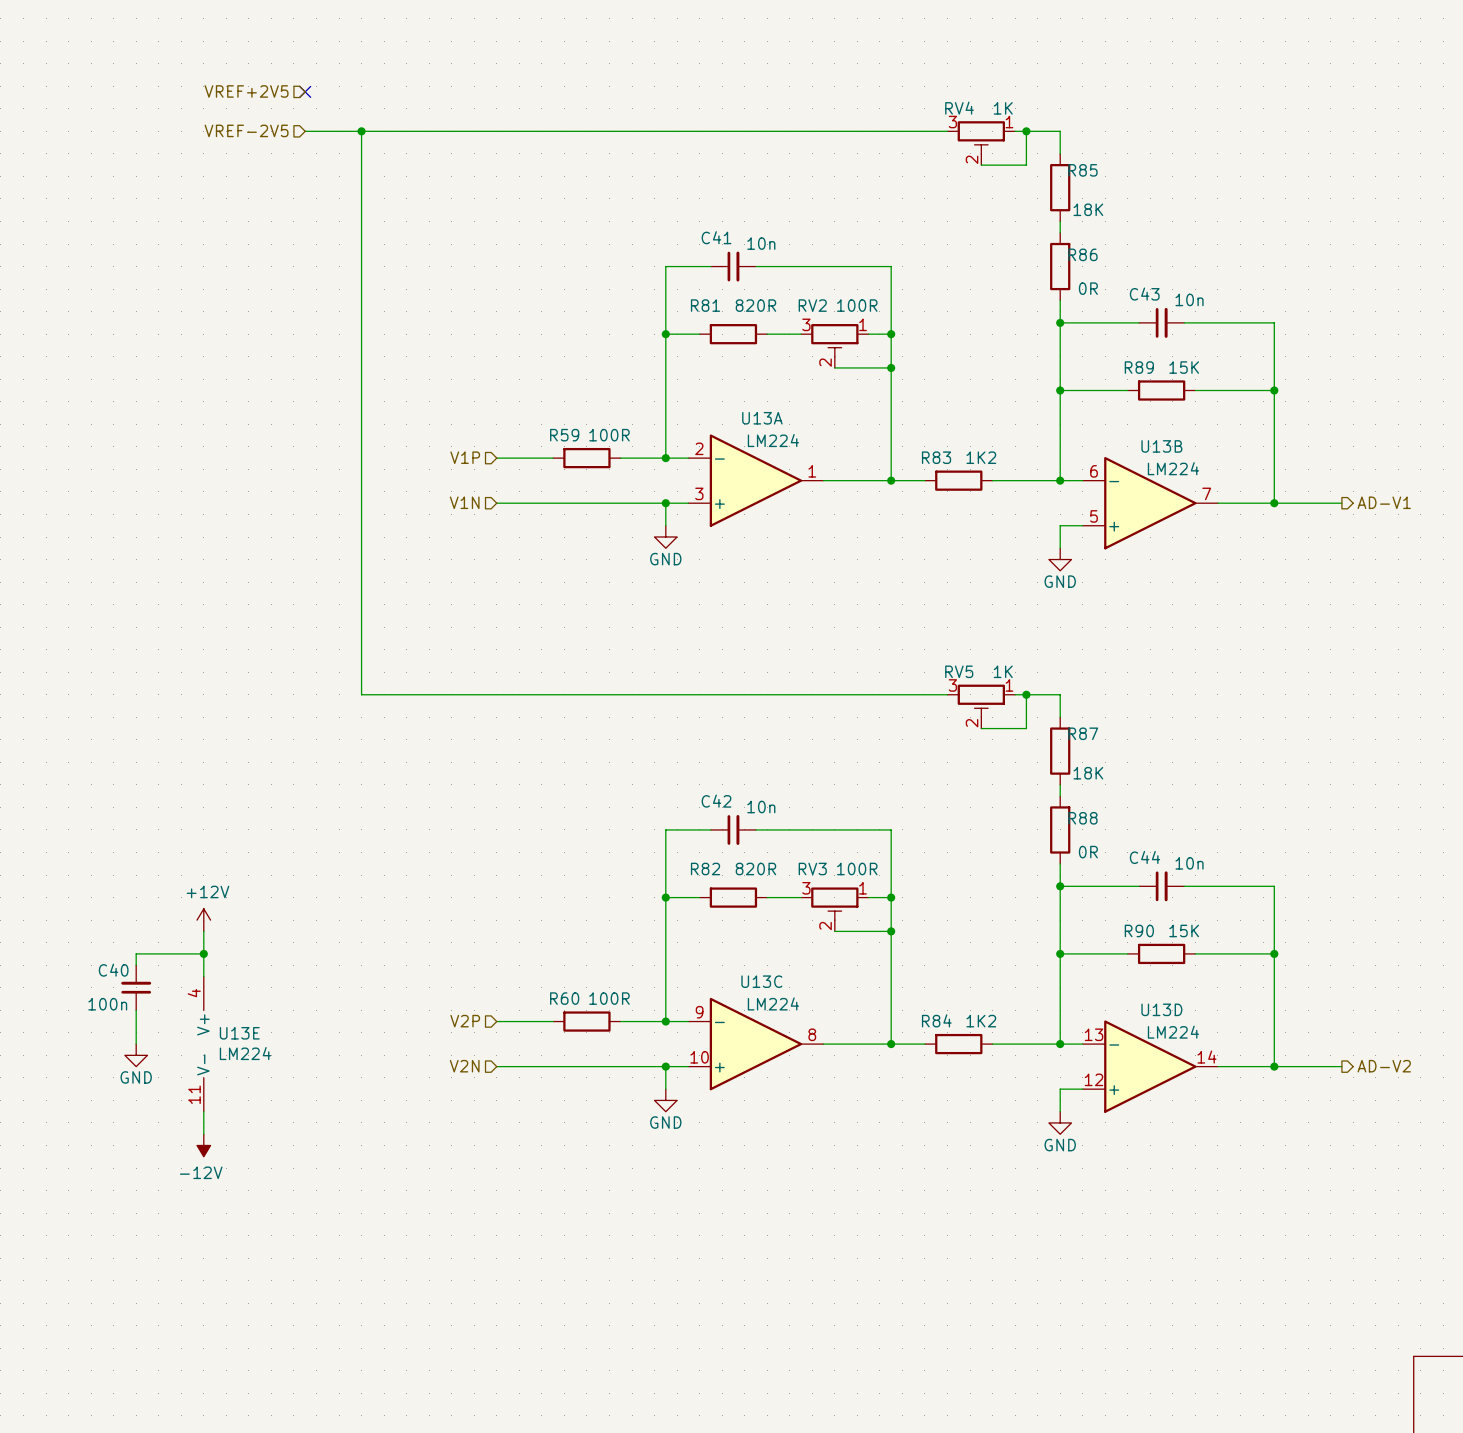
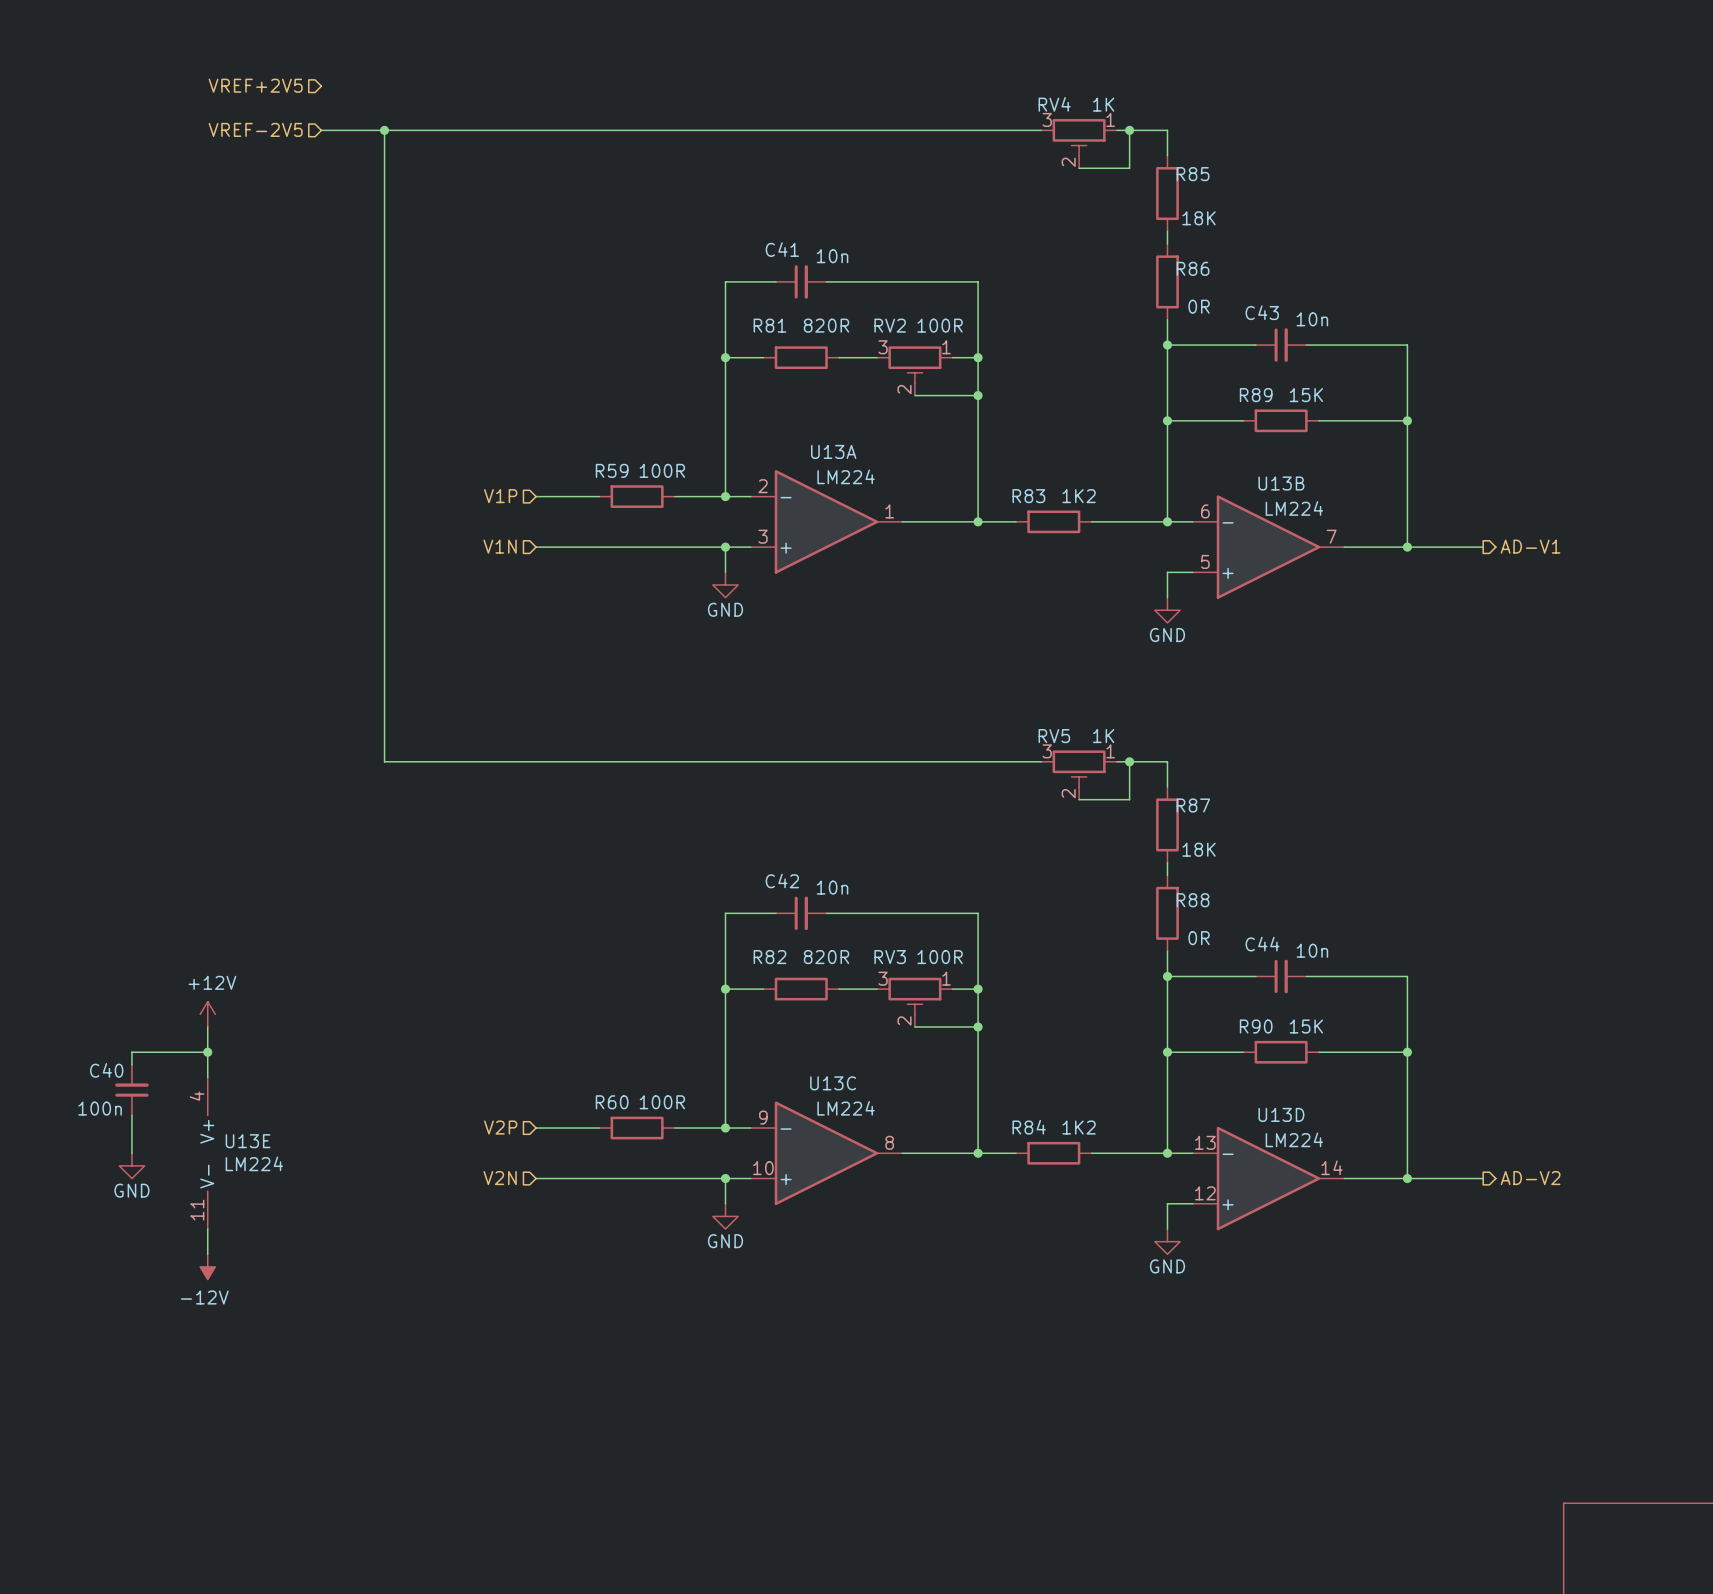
no-connect mark: (305, 91) -> none

